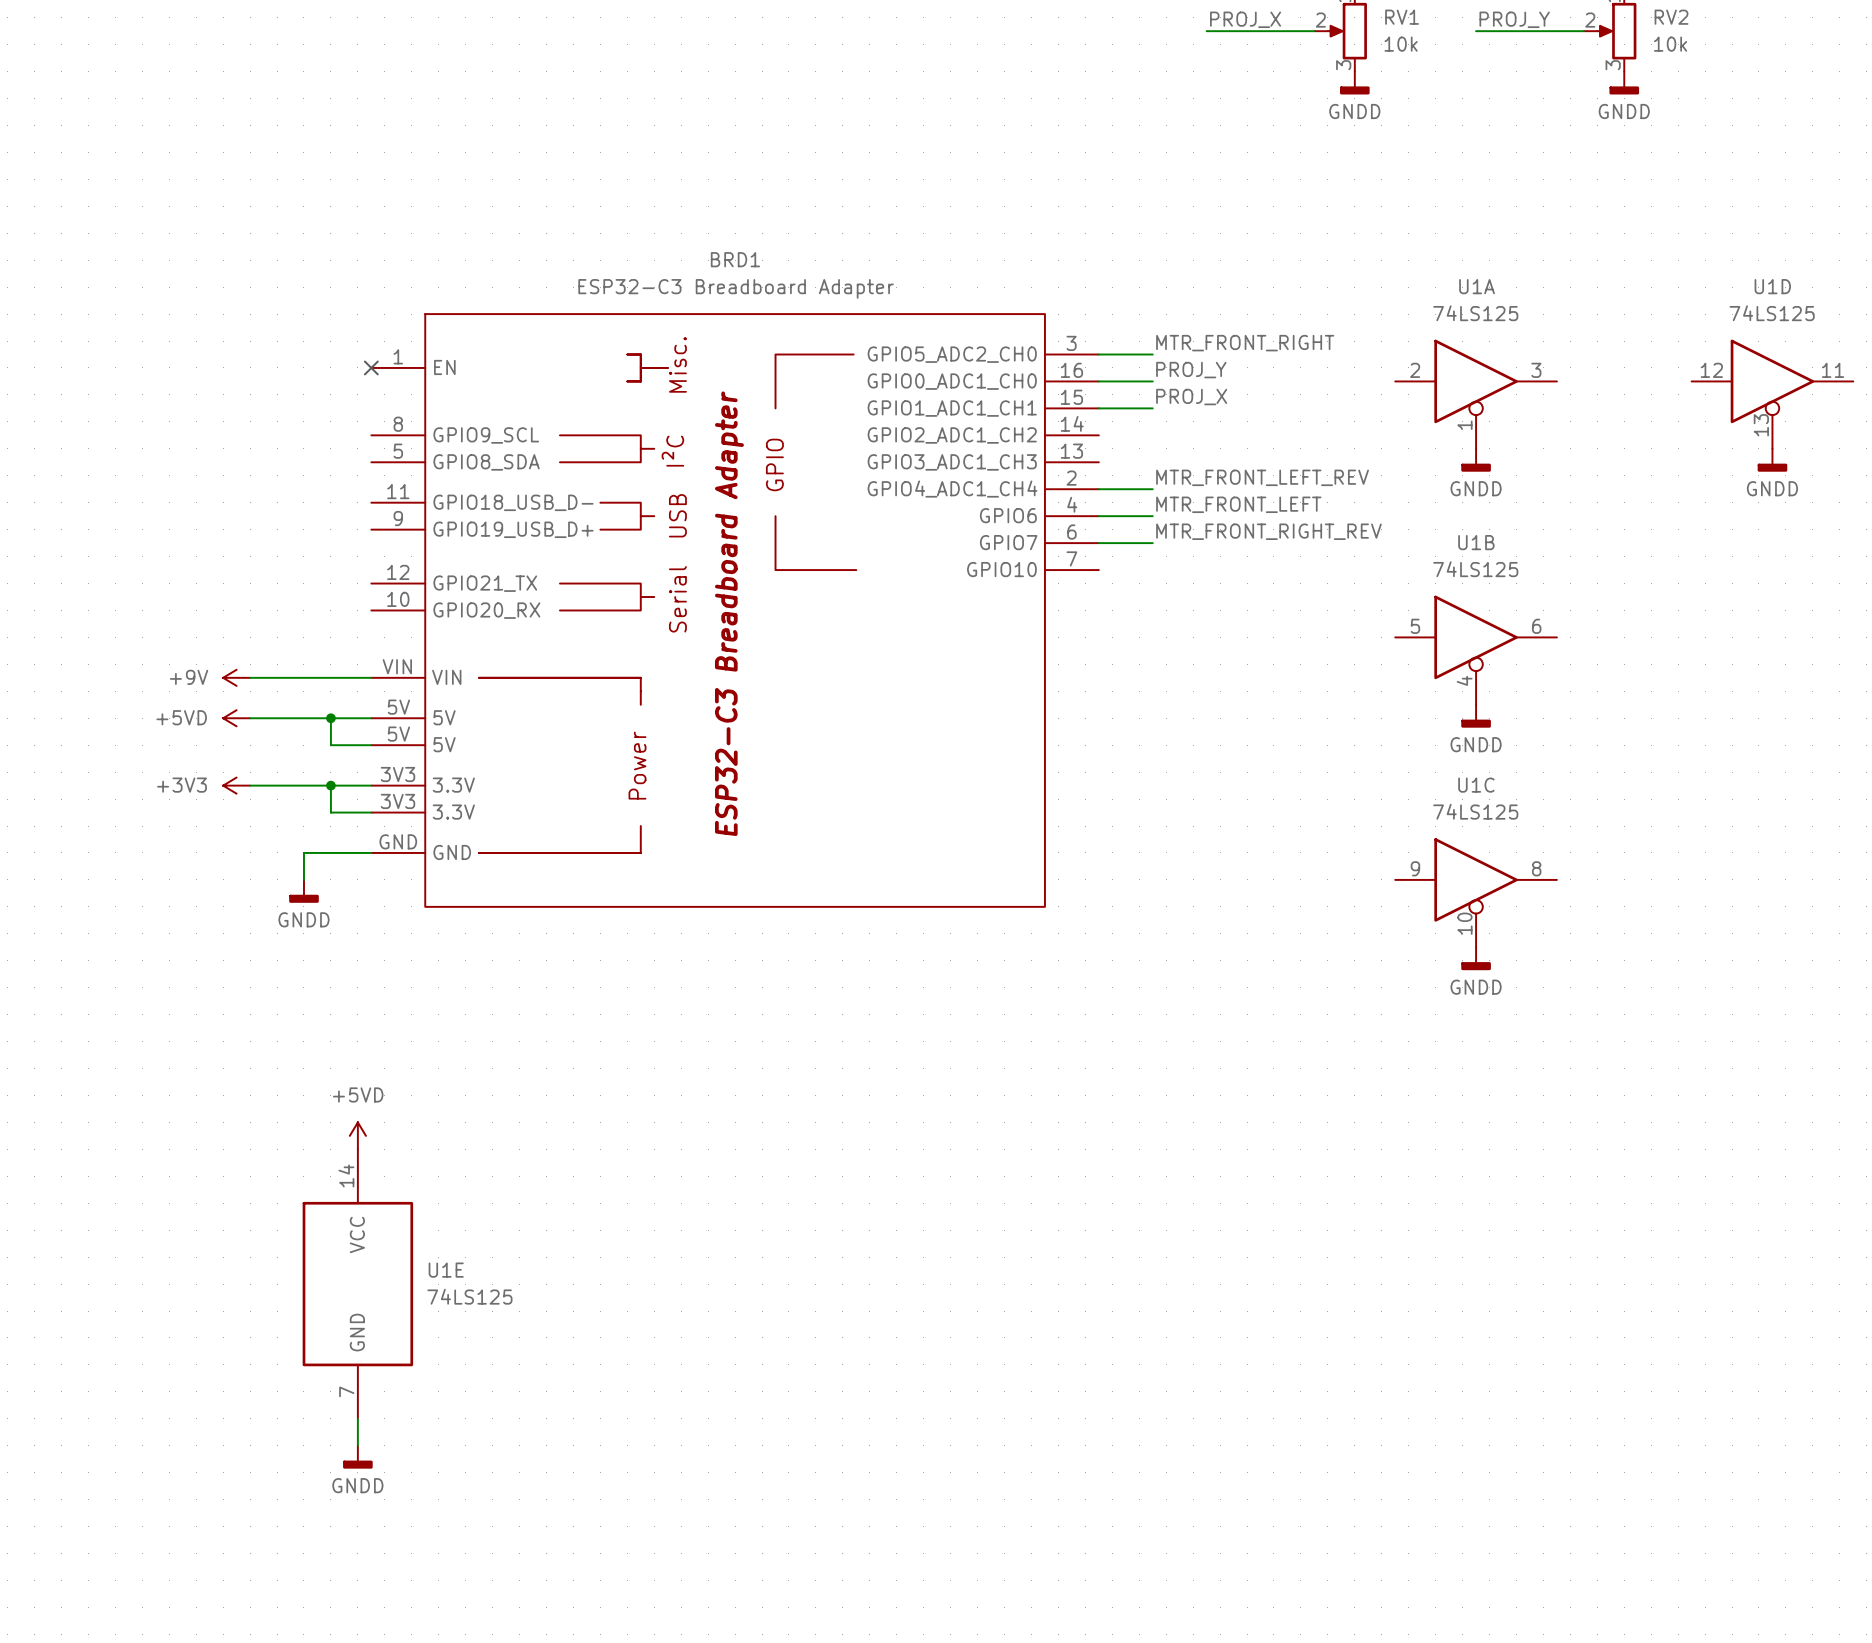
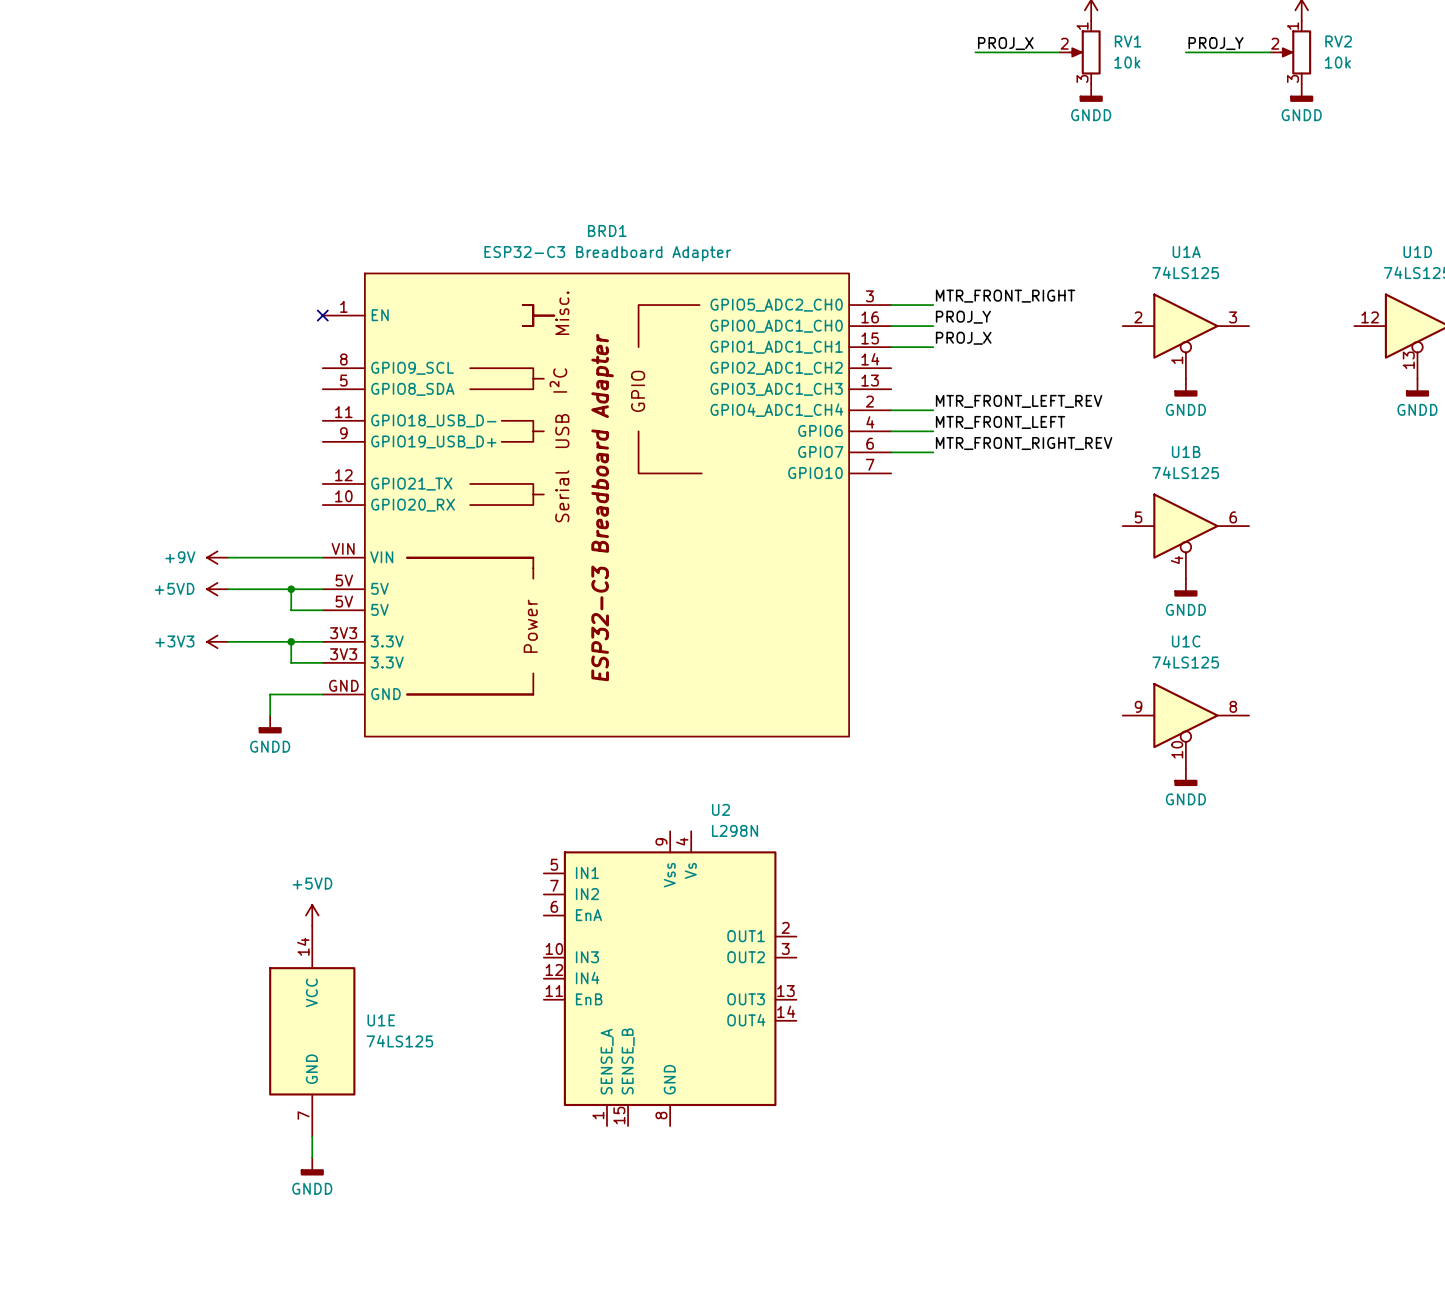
U2: none -> L298N (670, 978)

